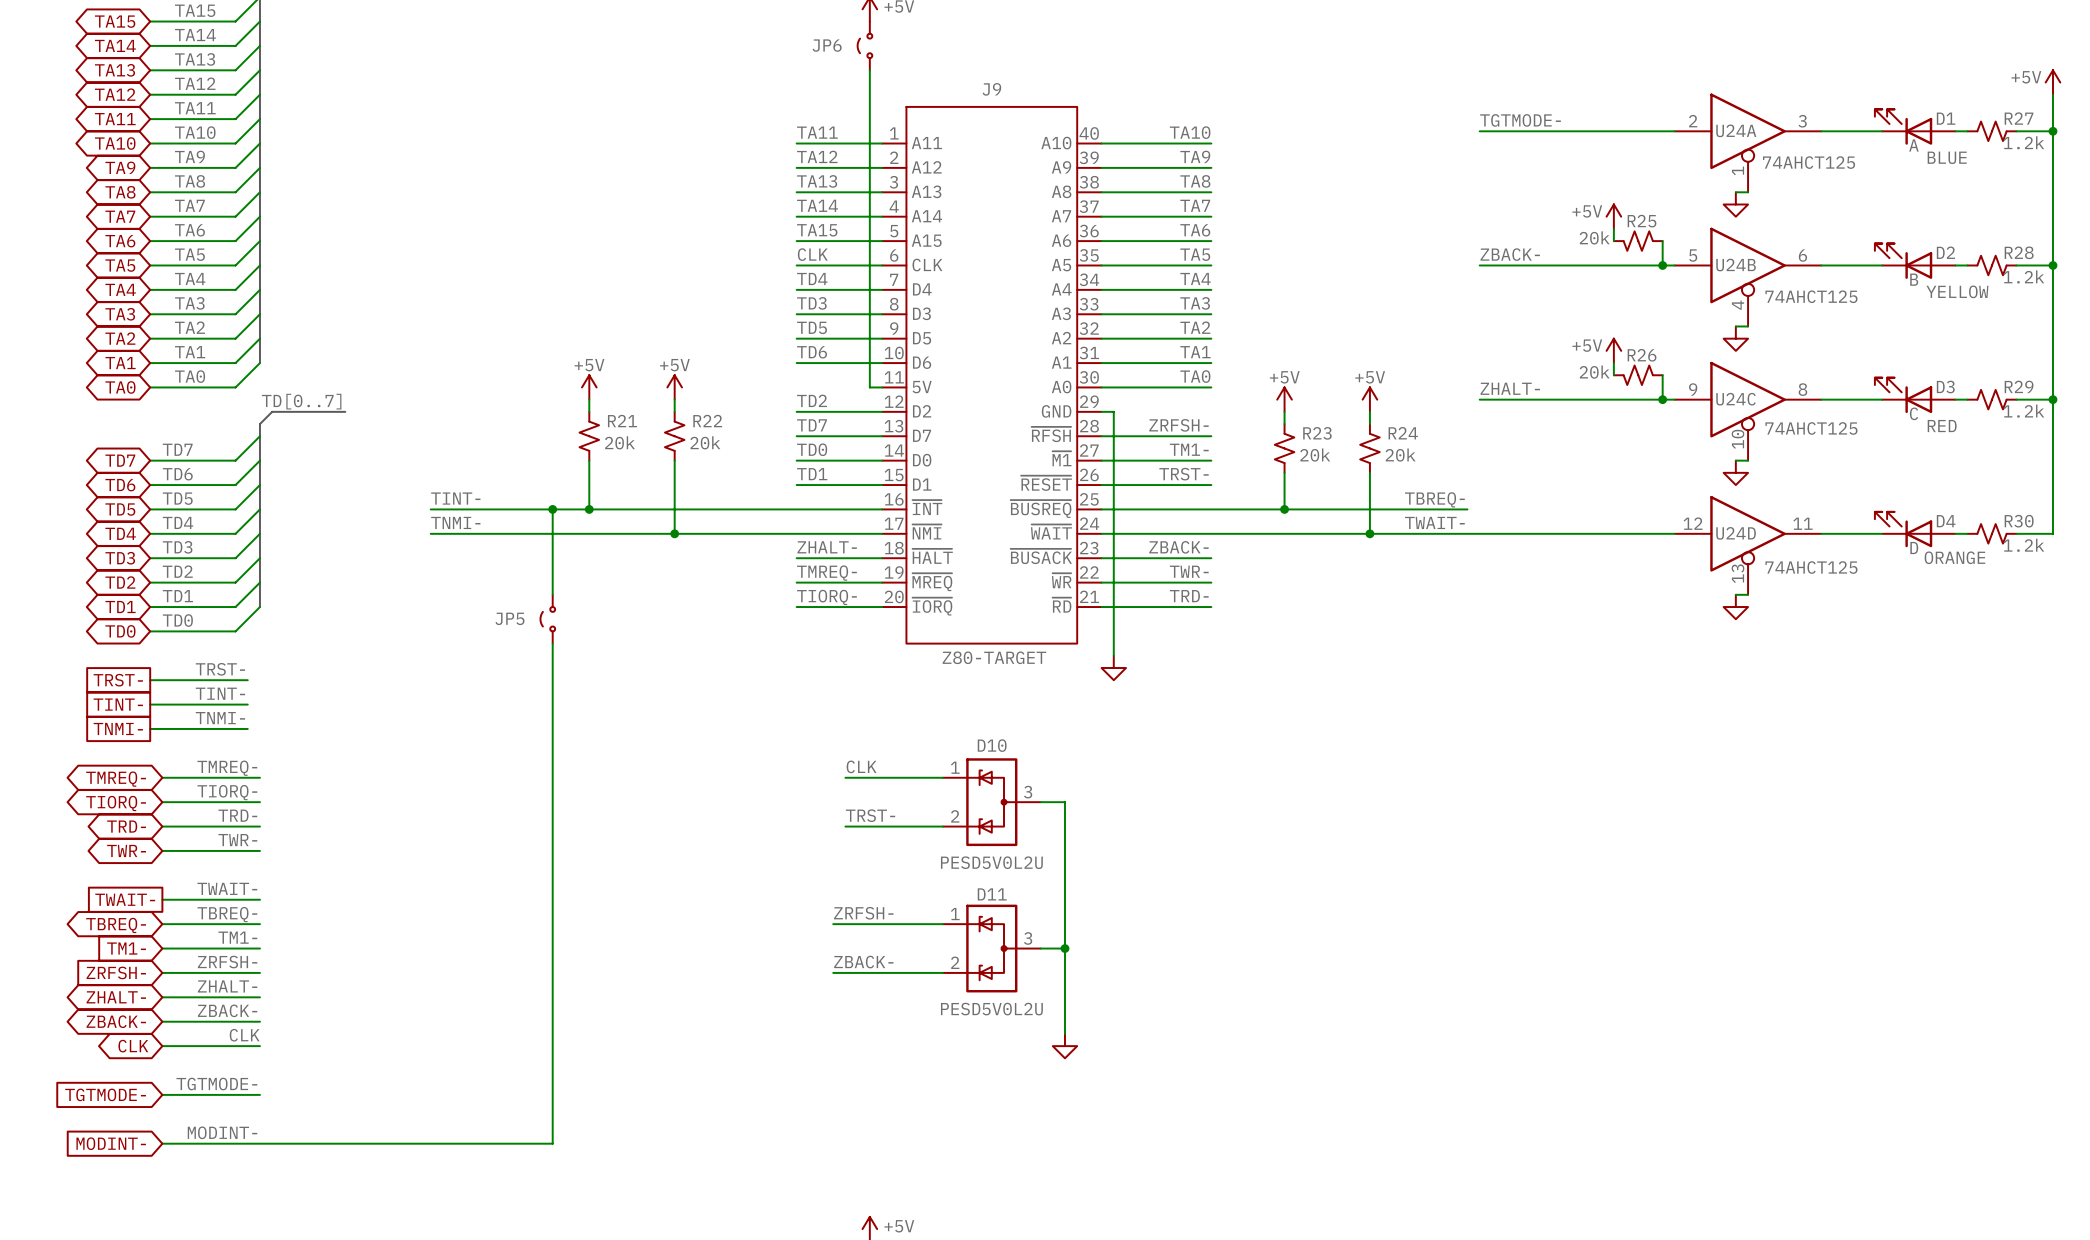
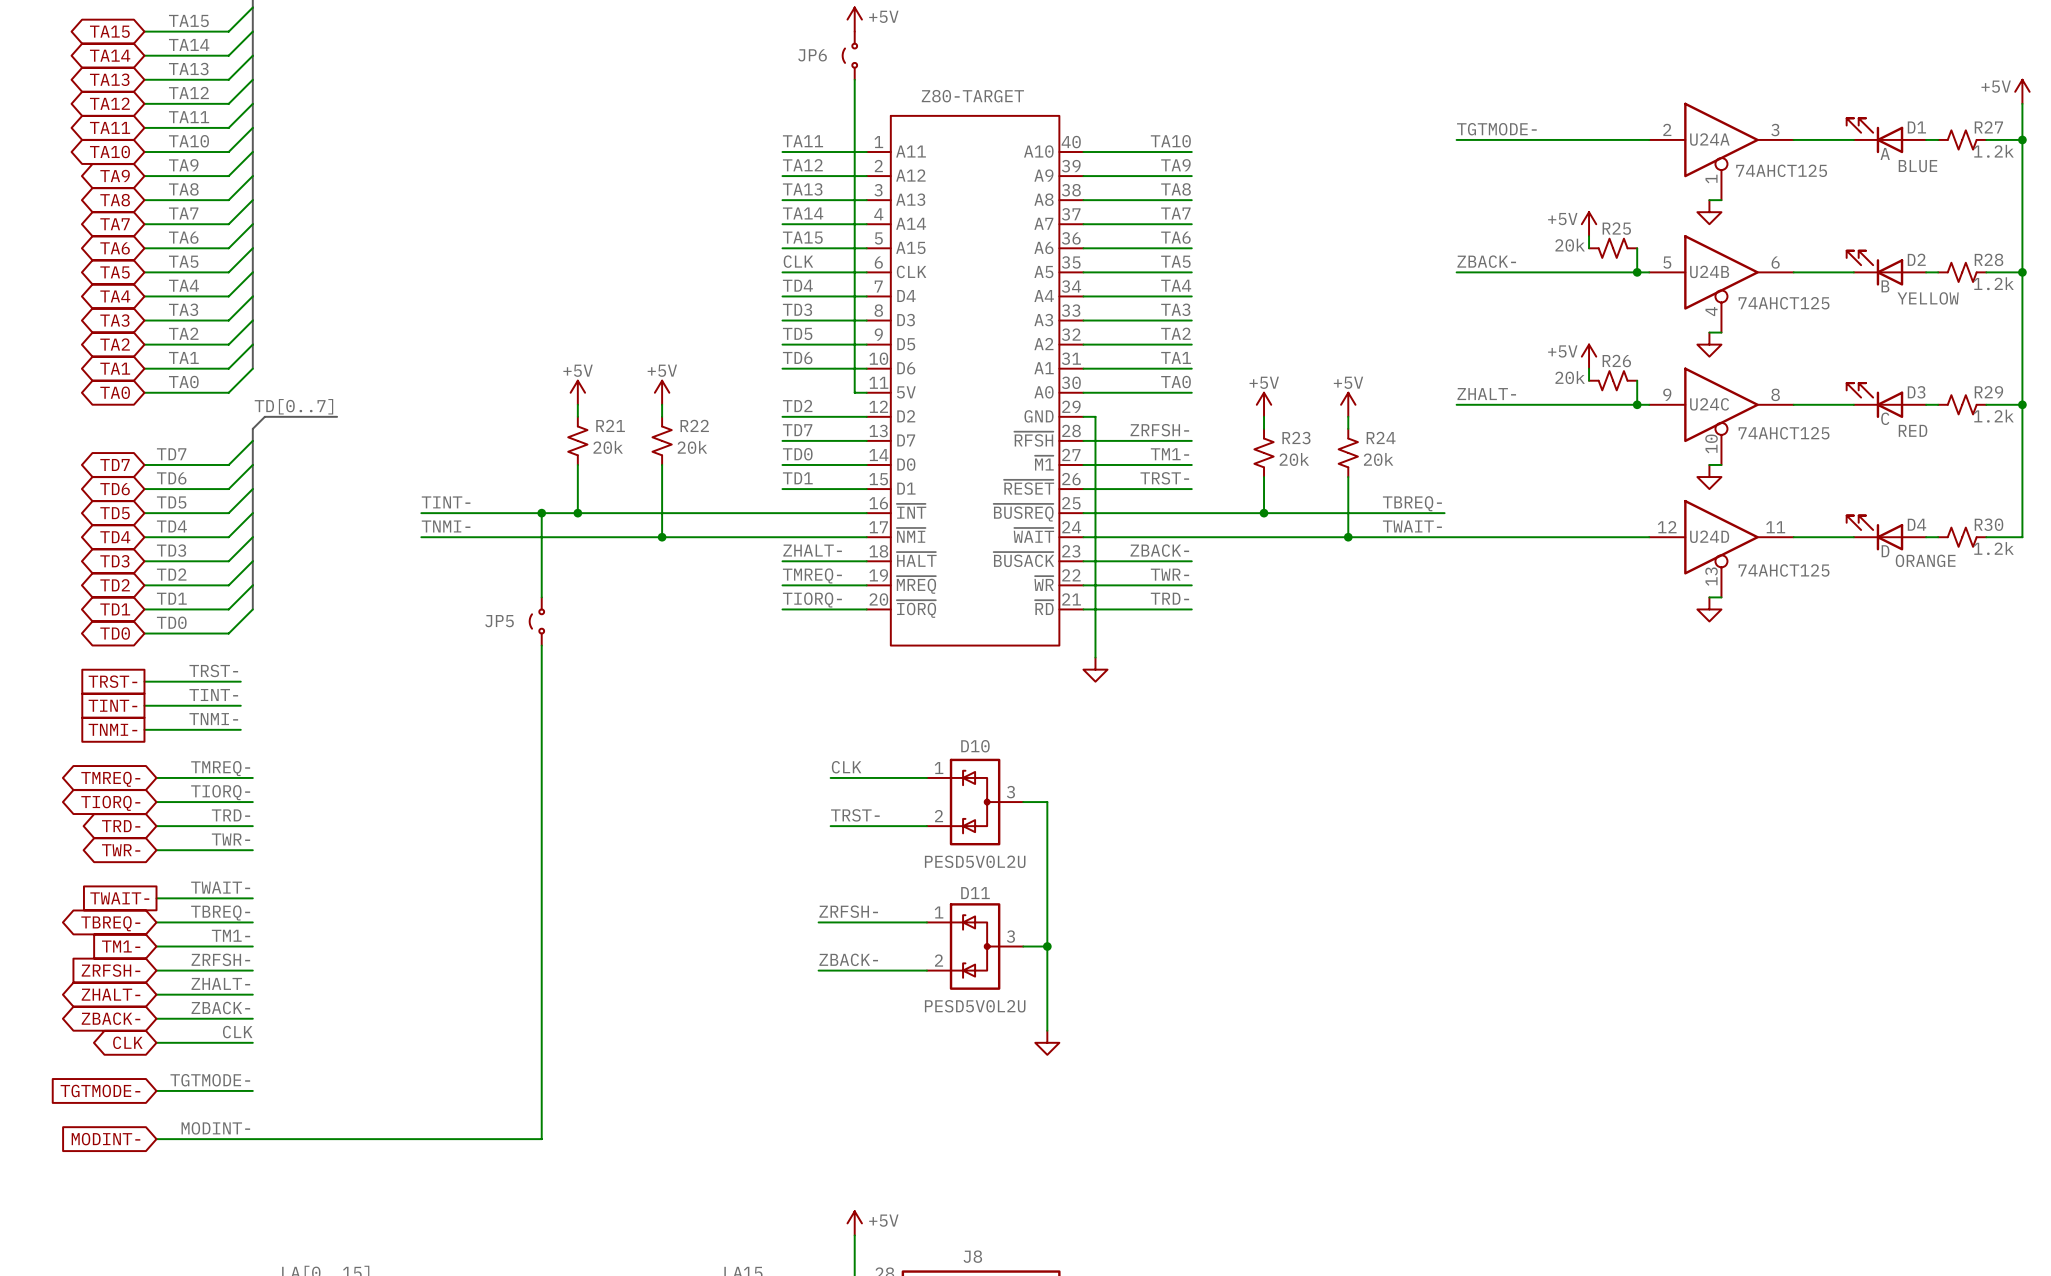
J9 name: J9 (991, 89) -> none
J9 value position: Z80-TARGET (994, 657) -> Z80-TARGET (972, 96)

